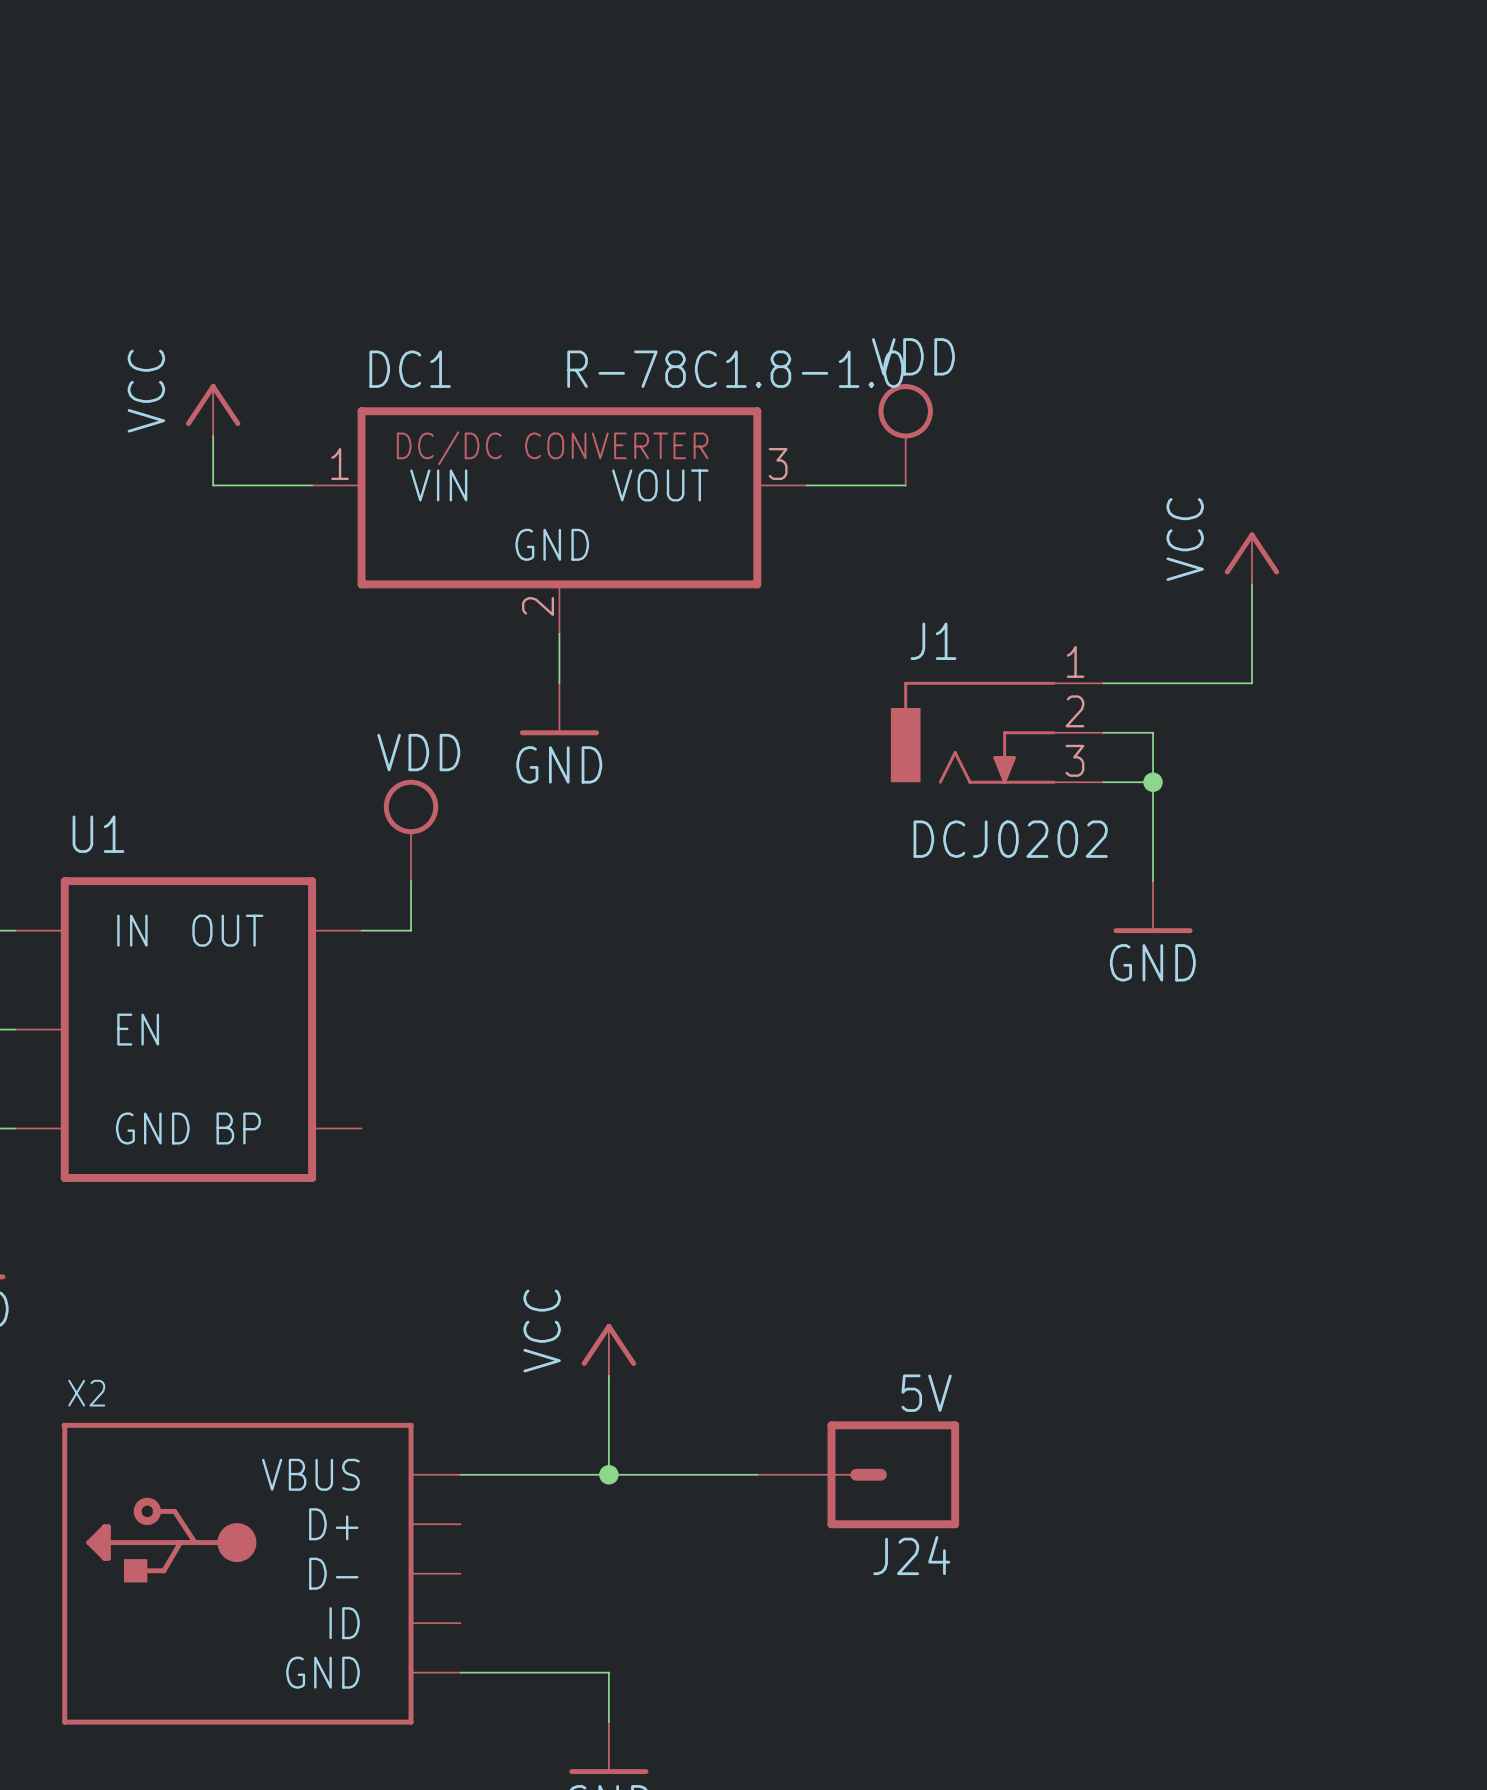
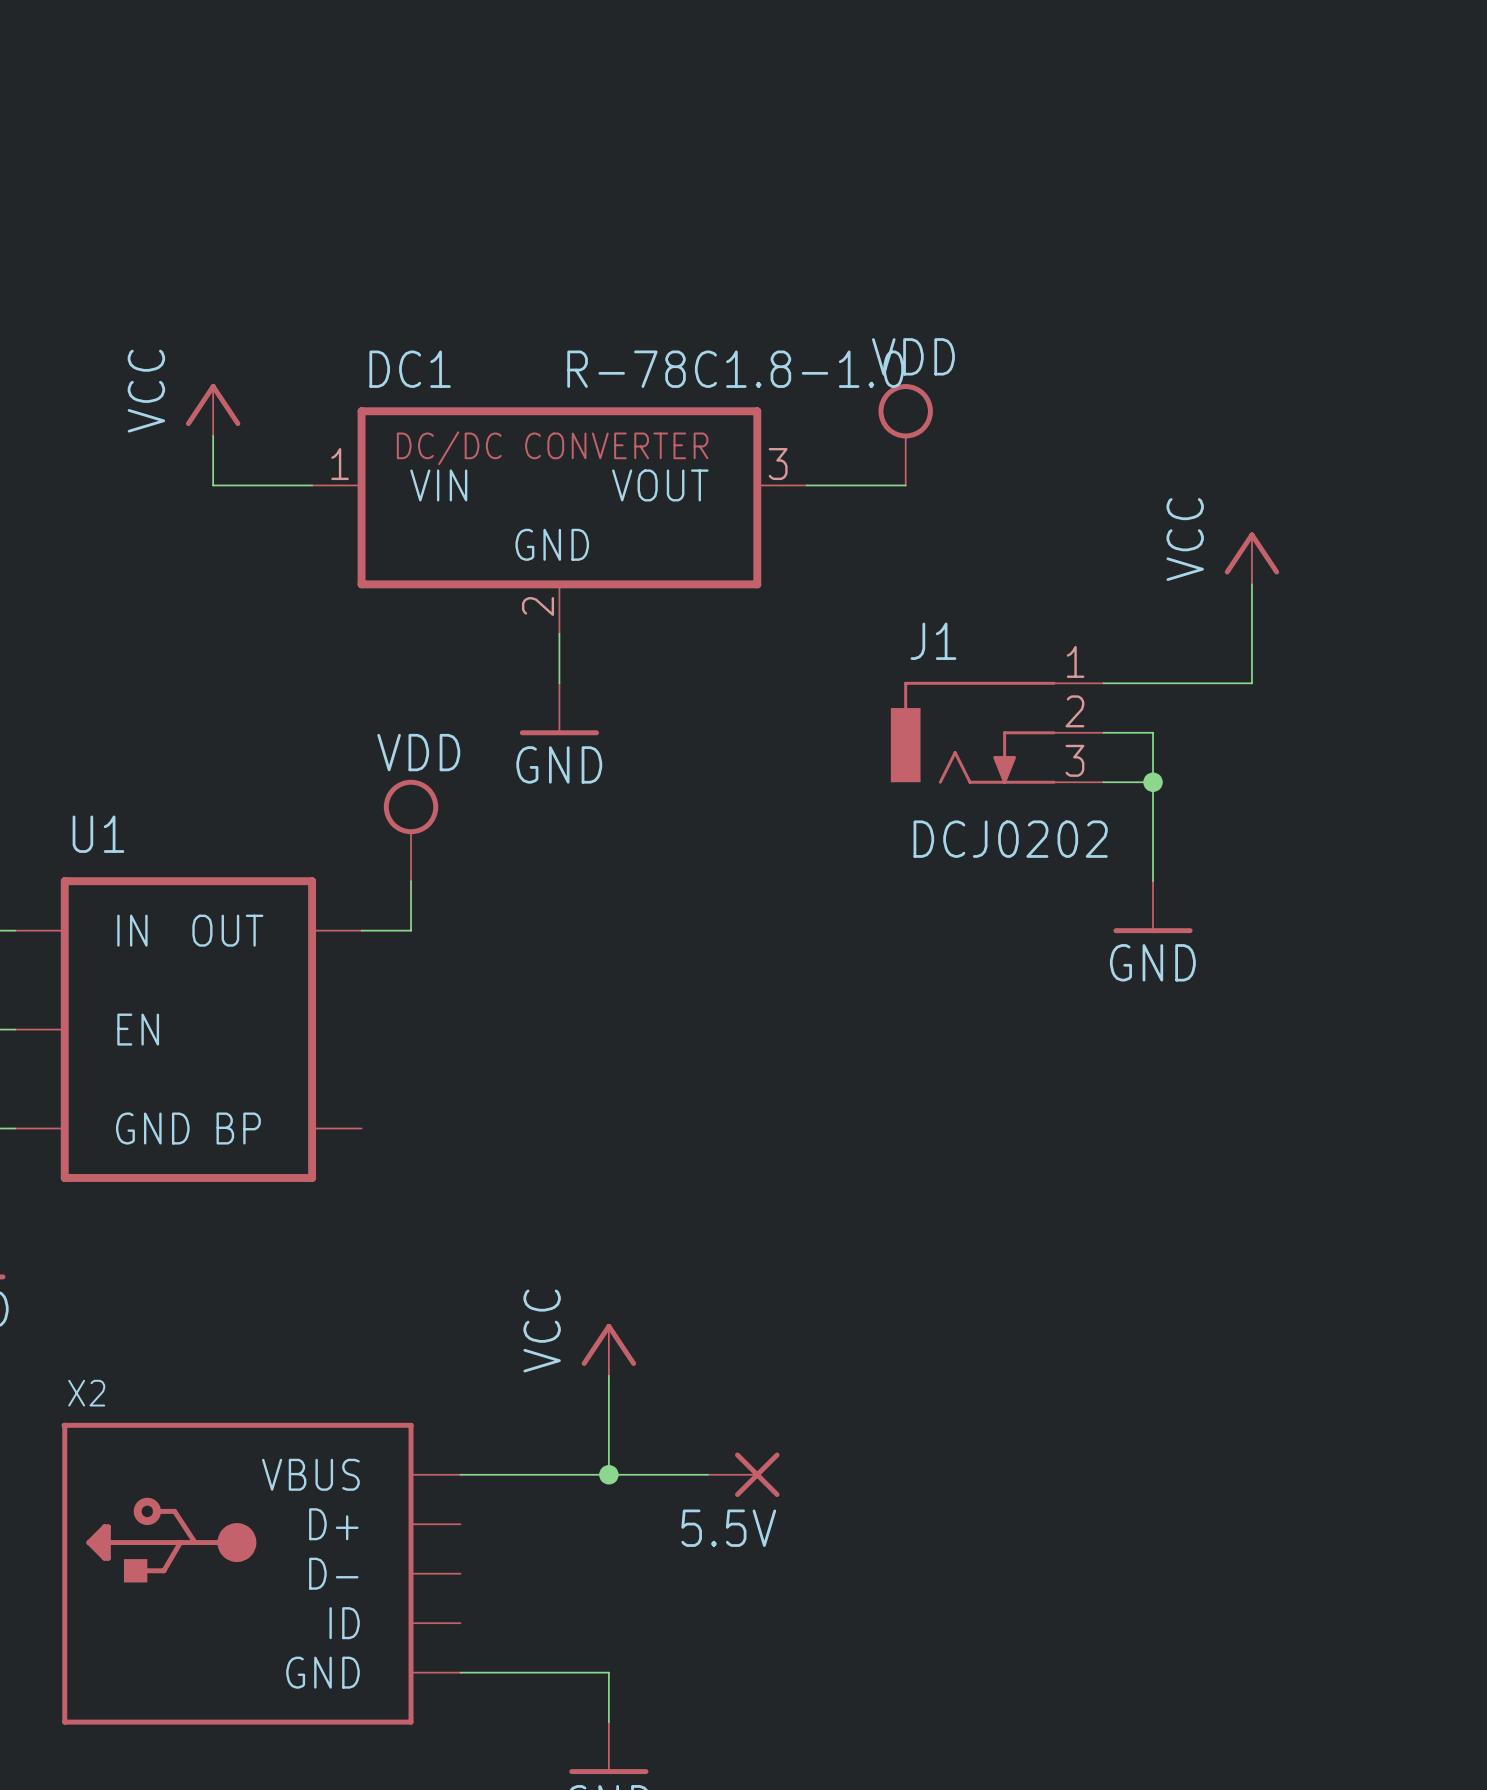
5.5V: none -> (743, 1474)
J24: 5V (858, 1474) -> none

